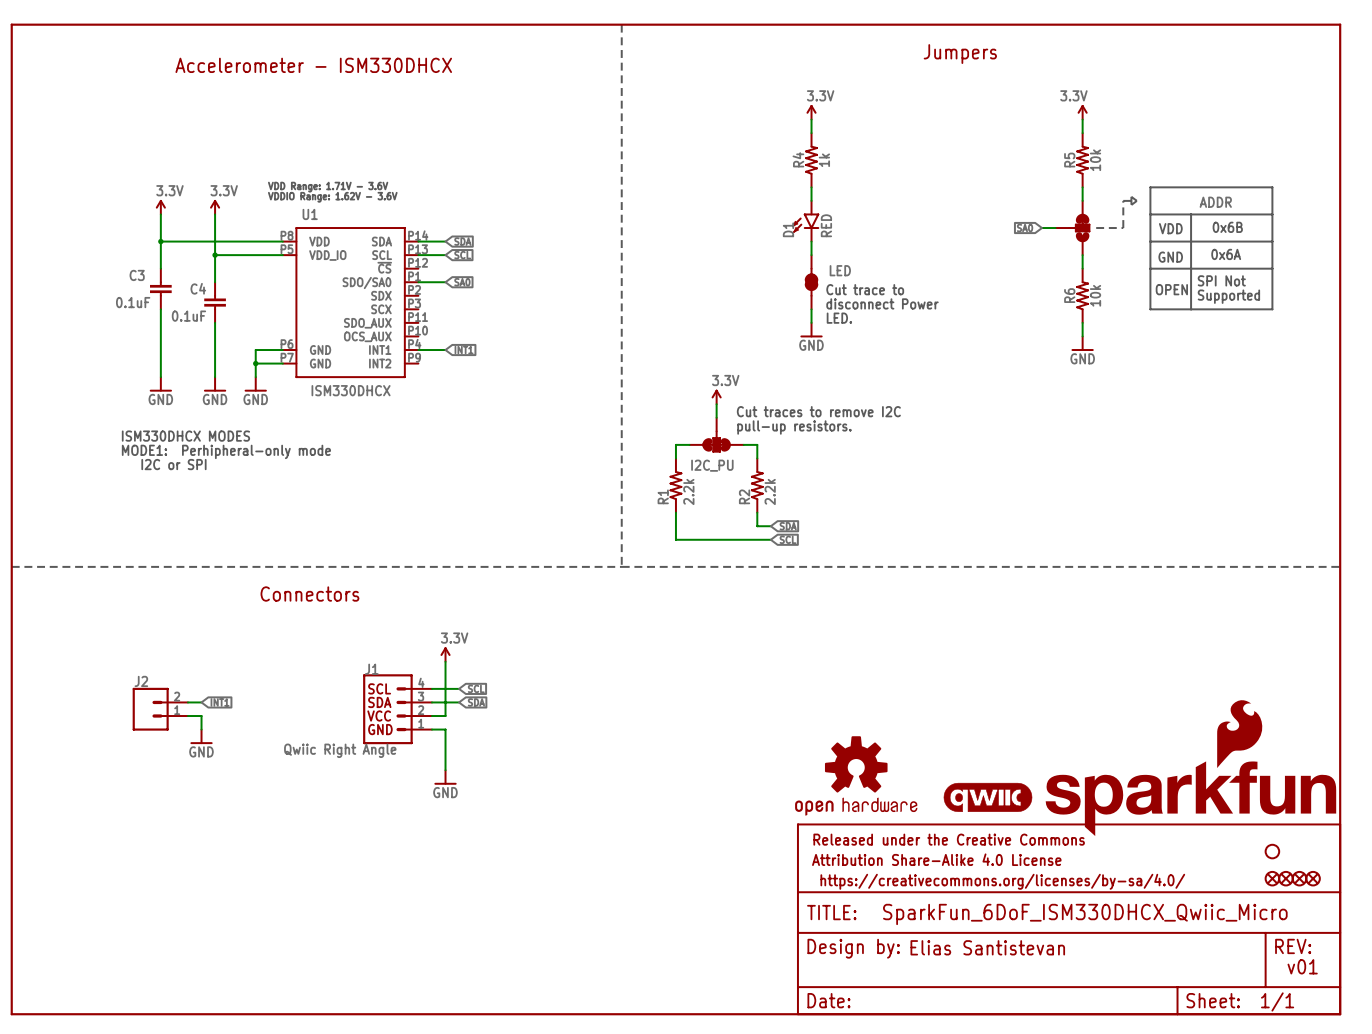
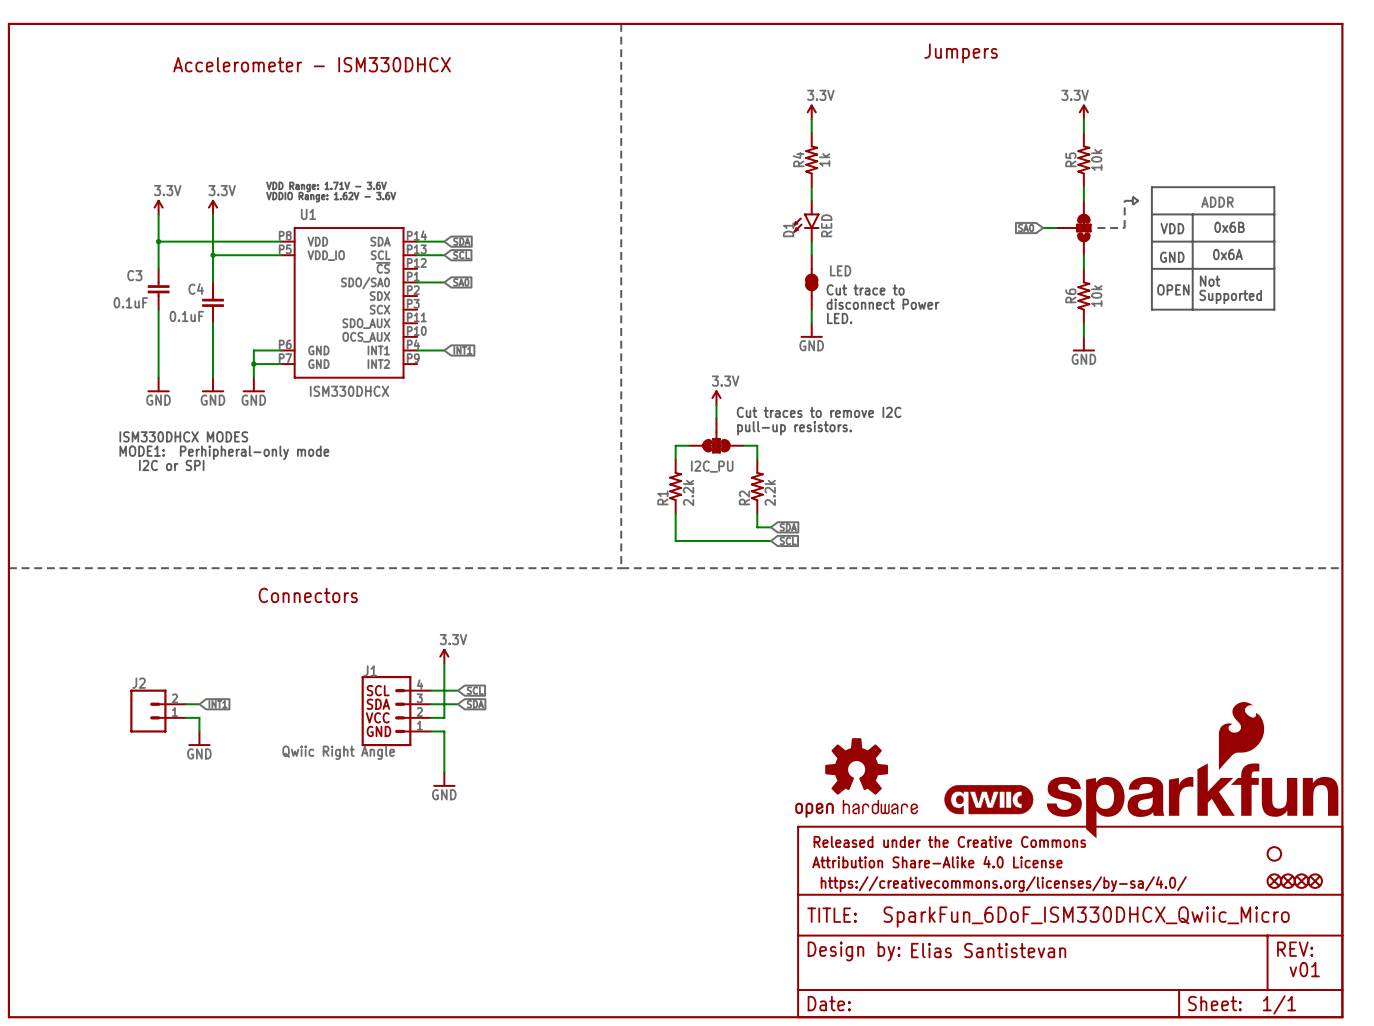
text: SPI Not (1221, 280) -> Not (1210, 281)

